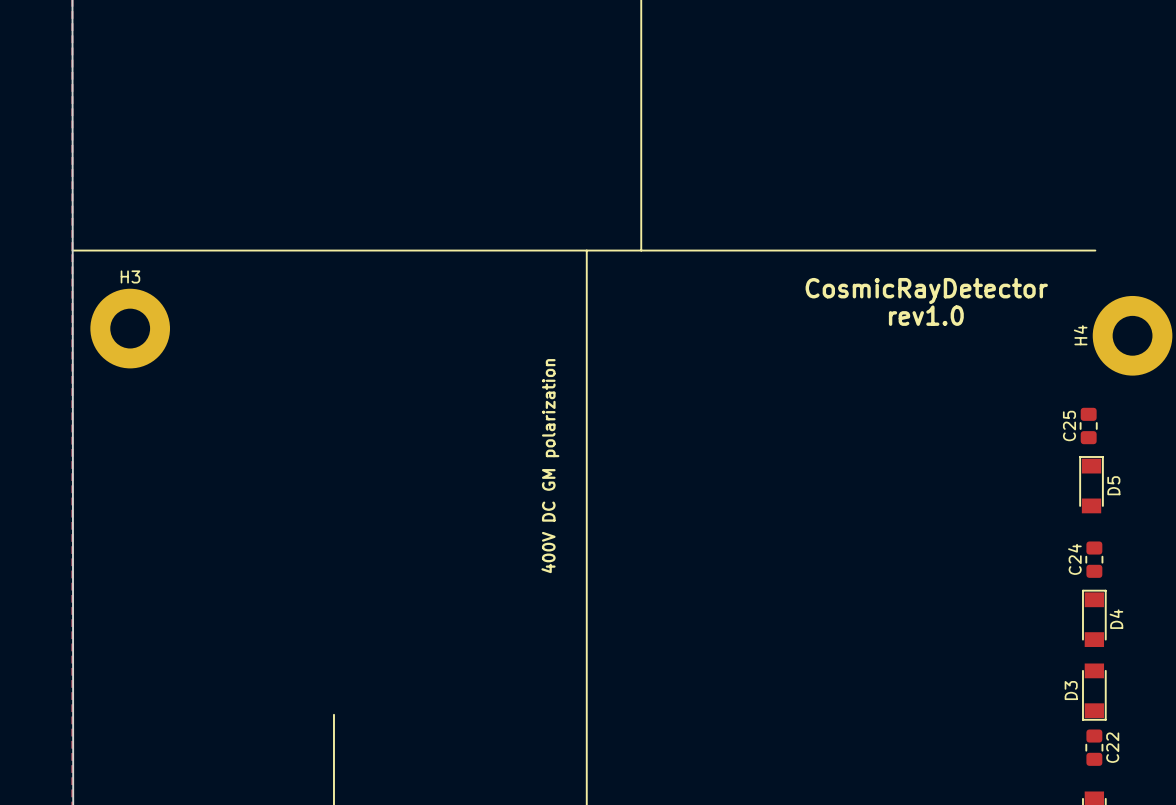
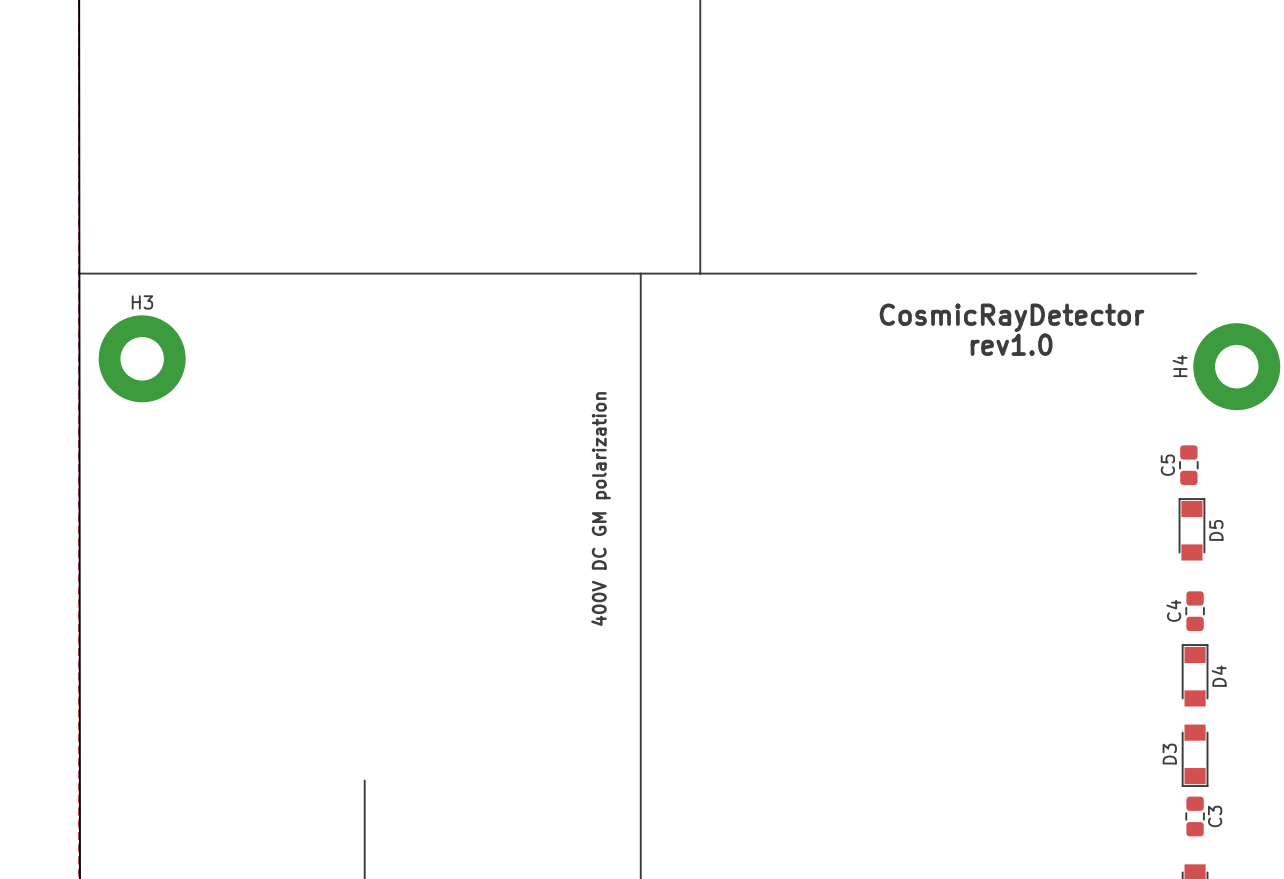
C25 name: C25 (1069, 425) -> C5 (1167, 465)
C24 name: C24 (1074, 559) -> C4 (1173, 610)
C22 name: C22 (1112, 747) -> C3 (1215, 816)

